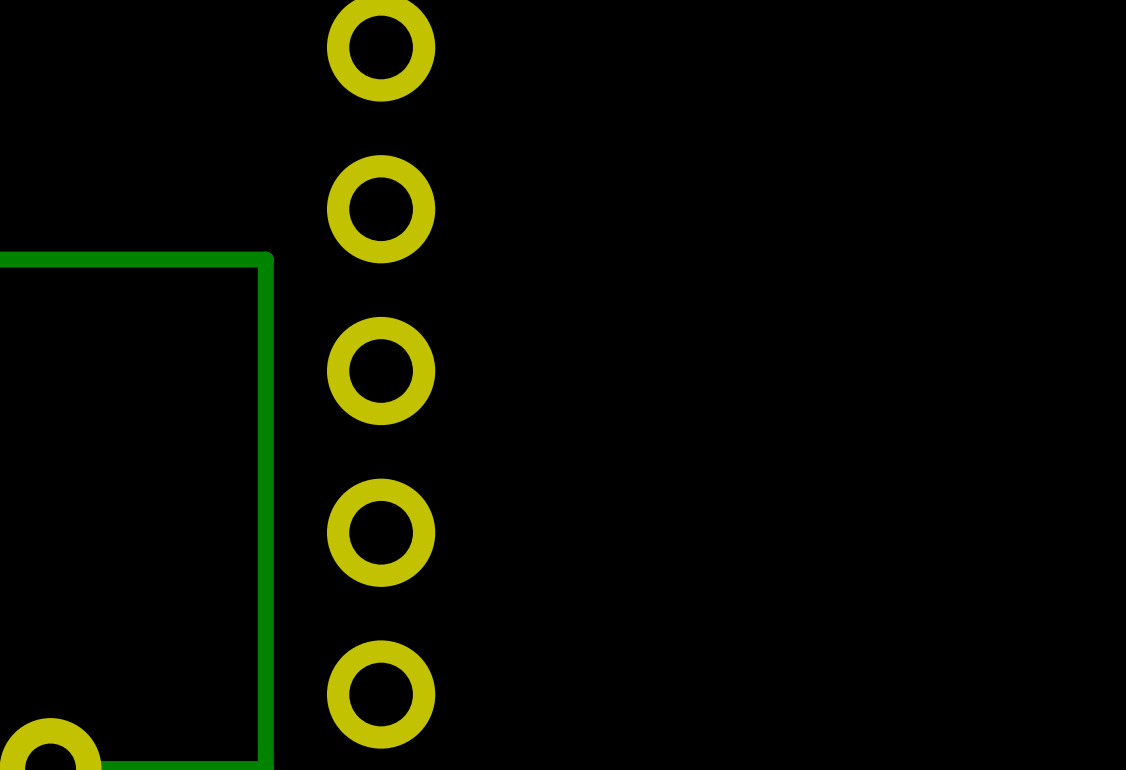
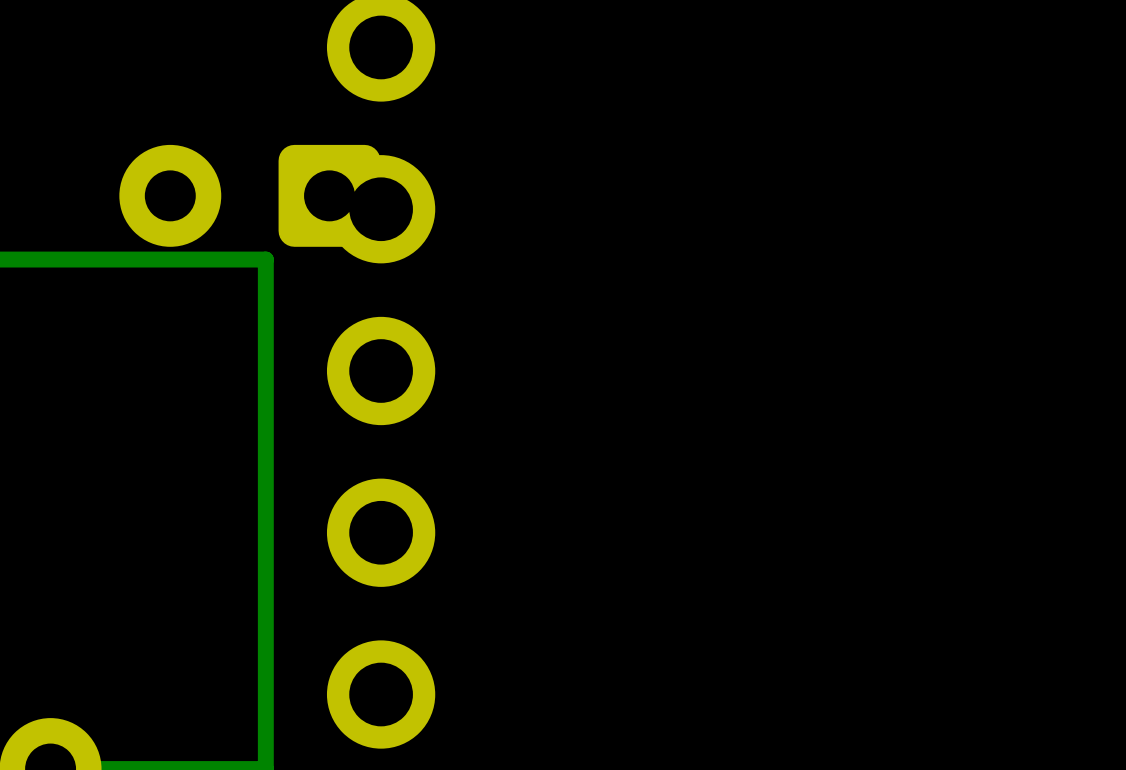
part: none -> (249, 195)

